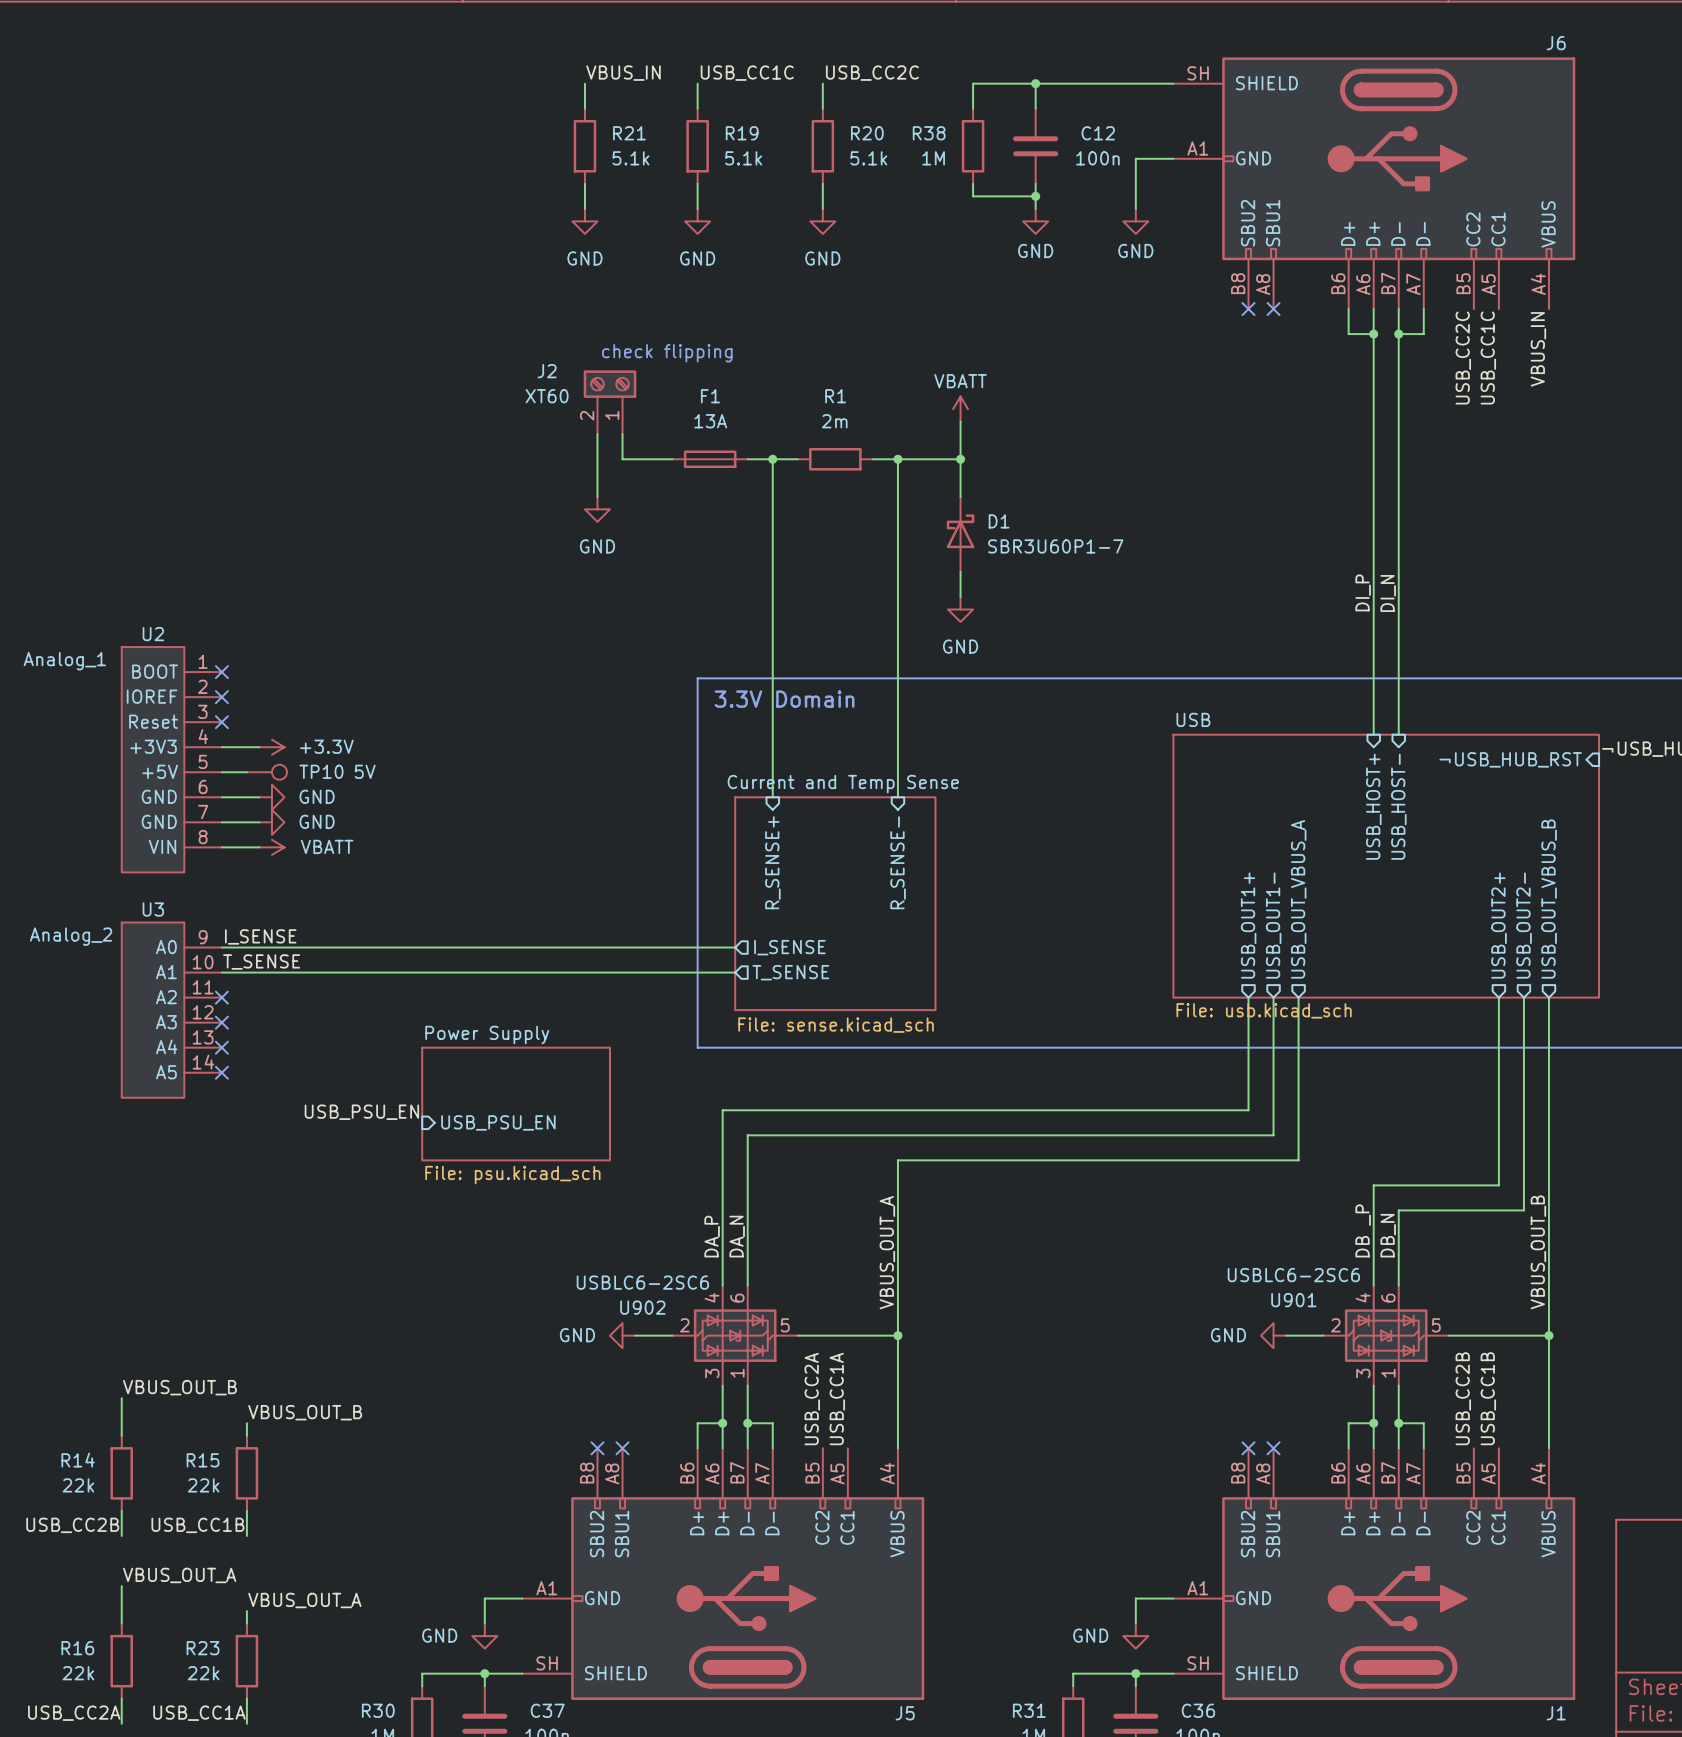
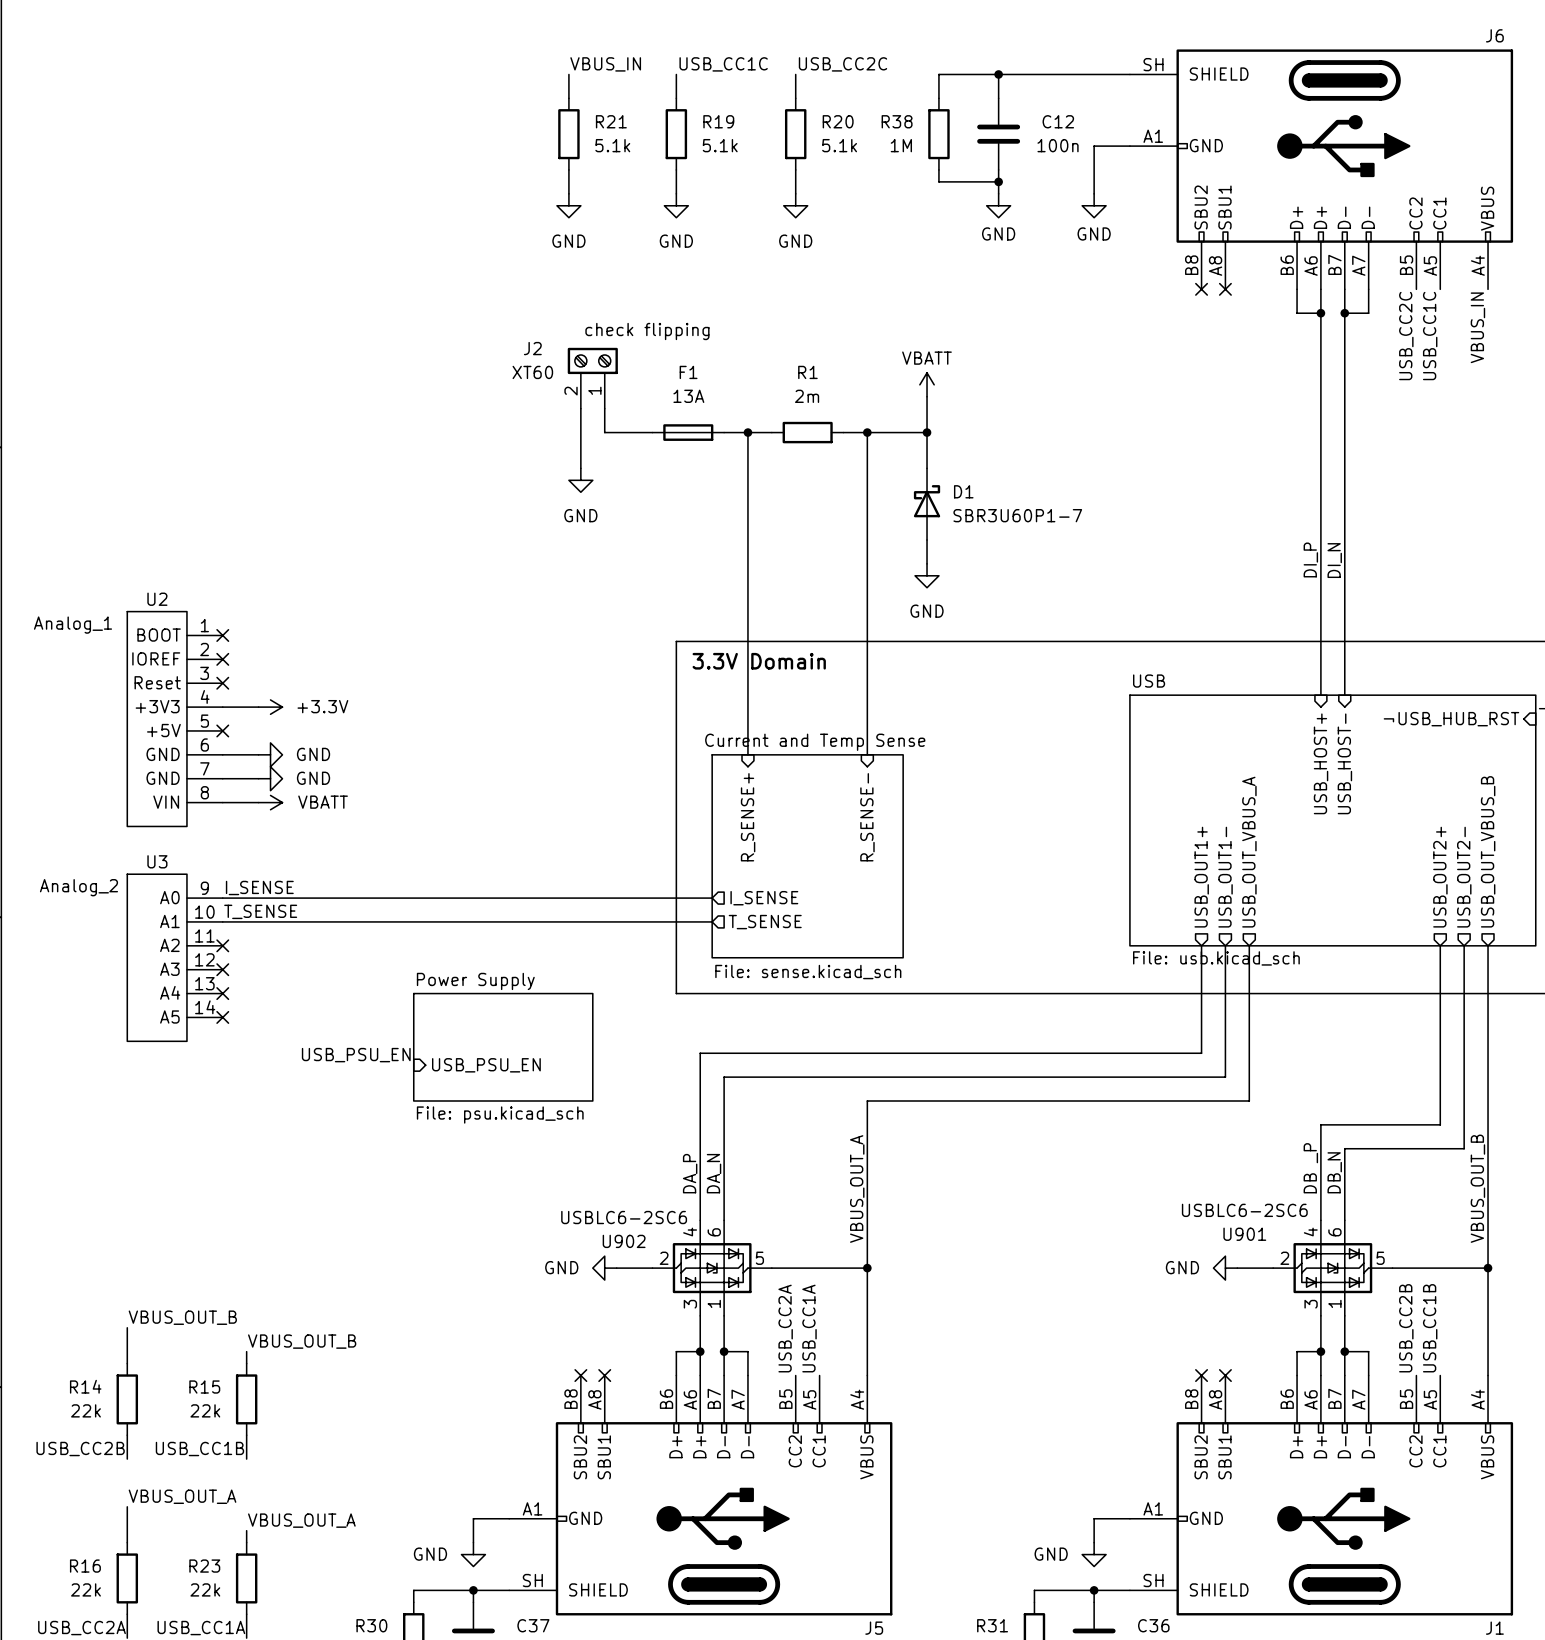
wire: (221, 772) (246, 772) -> none
no-connect mark: none -> (222, 730)
TP10: 5V (266, 772) -> none

